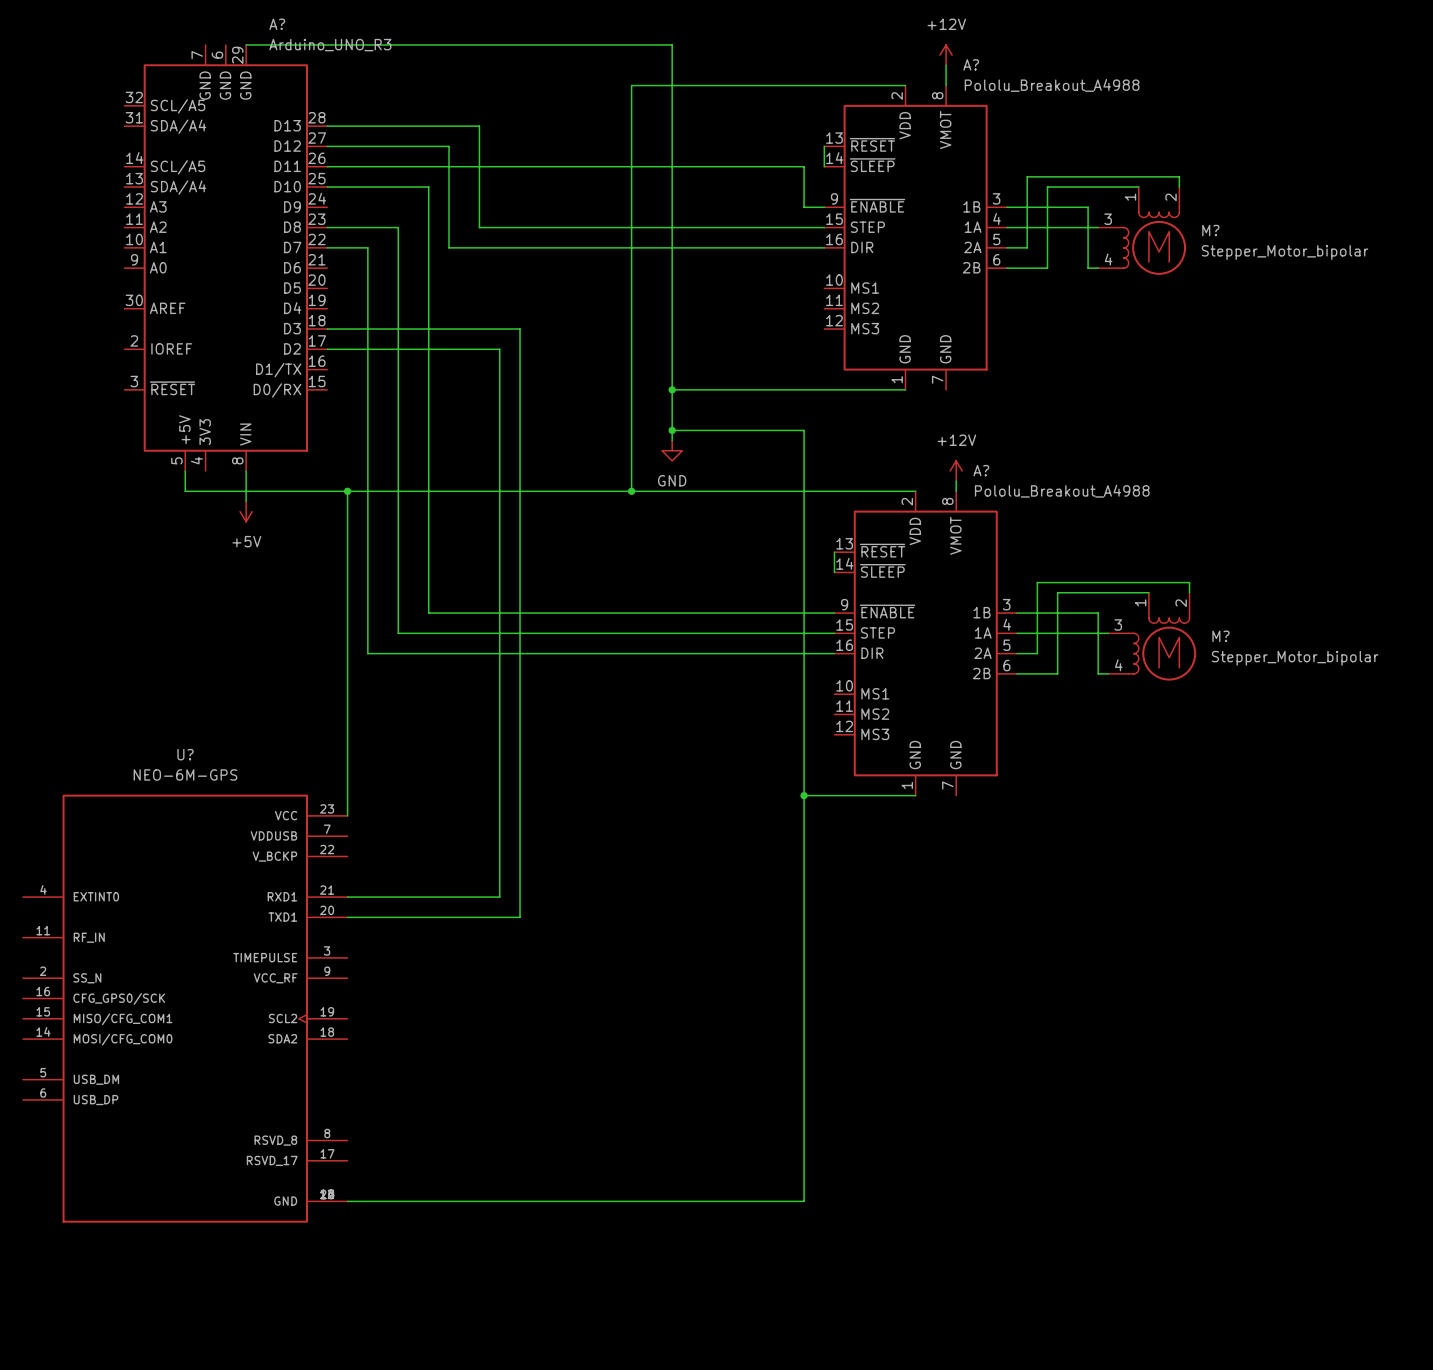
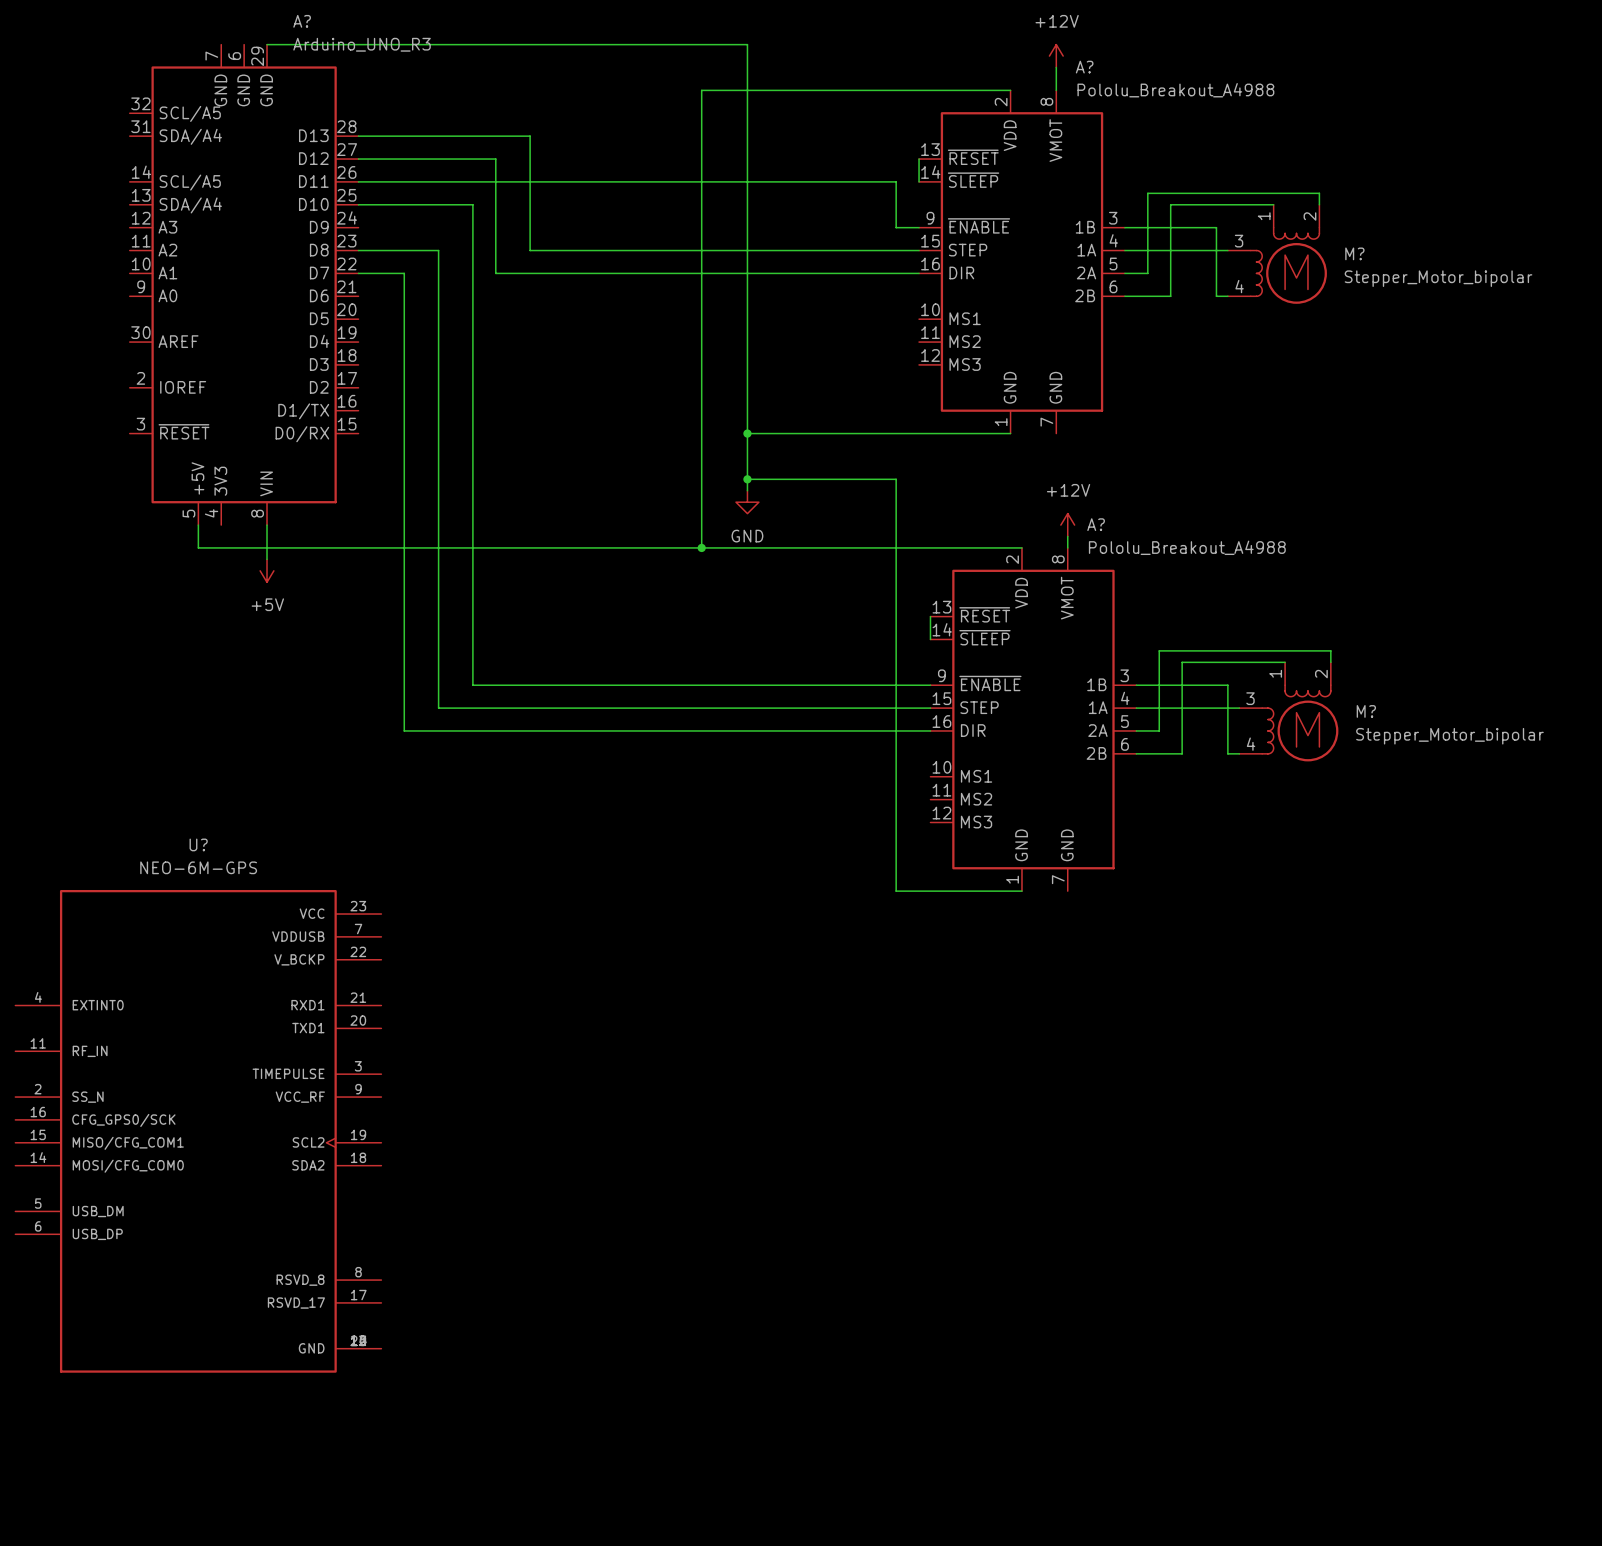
wire: (327, 329) (520, 329) (520, 917) (347, 917) -> none
wire: (327, 349) (499, 349) (499, 897) (347, 897) -> none
wire: (347, 491) (347, 815) -> none
junction: (347, 491) -> none
wire: (804, 795) (804, 1201) (347, 1201) -> none
junction: (804, 795) -> none

